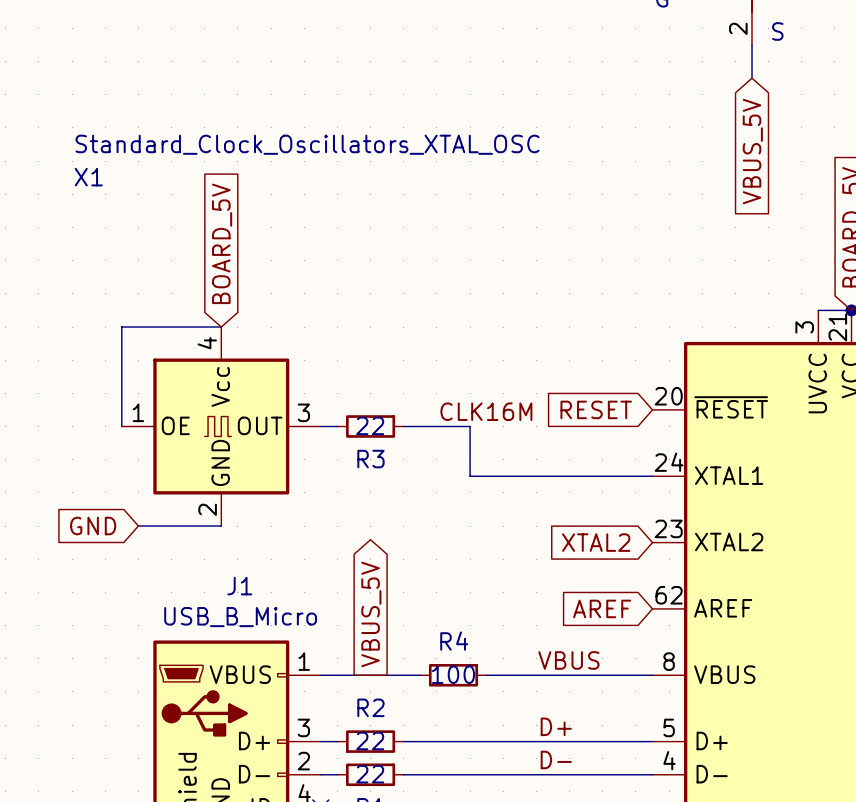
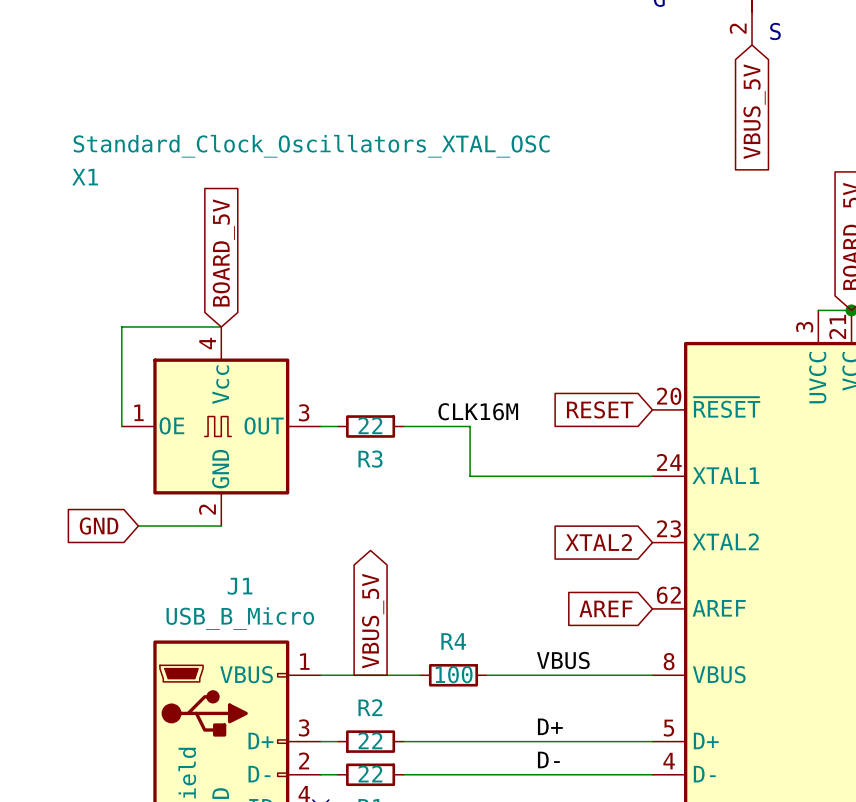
wire: (752, 45) (752, 78) -> none
global label position: VBUS_5V (752, 151) -> VBUS_5V (754, 111)

